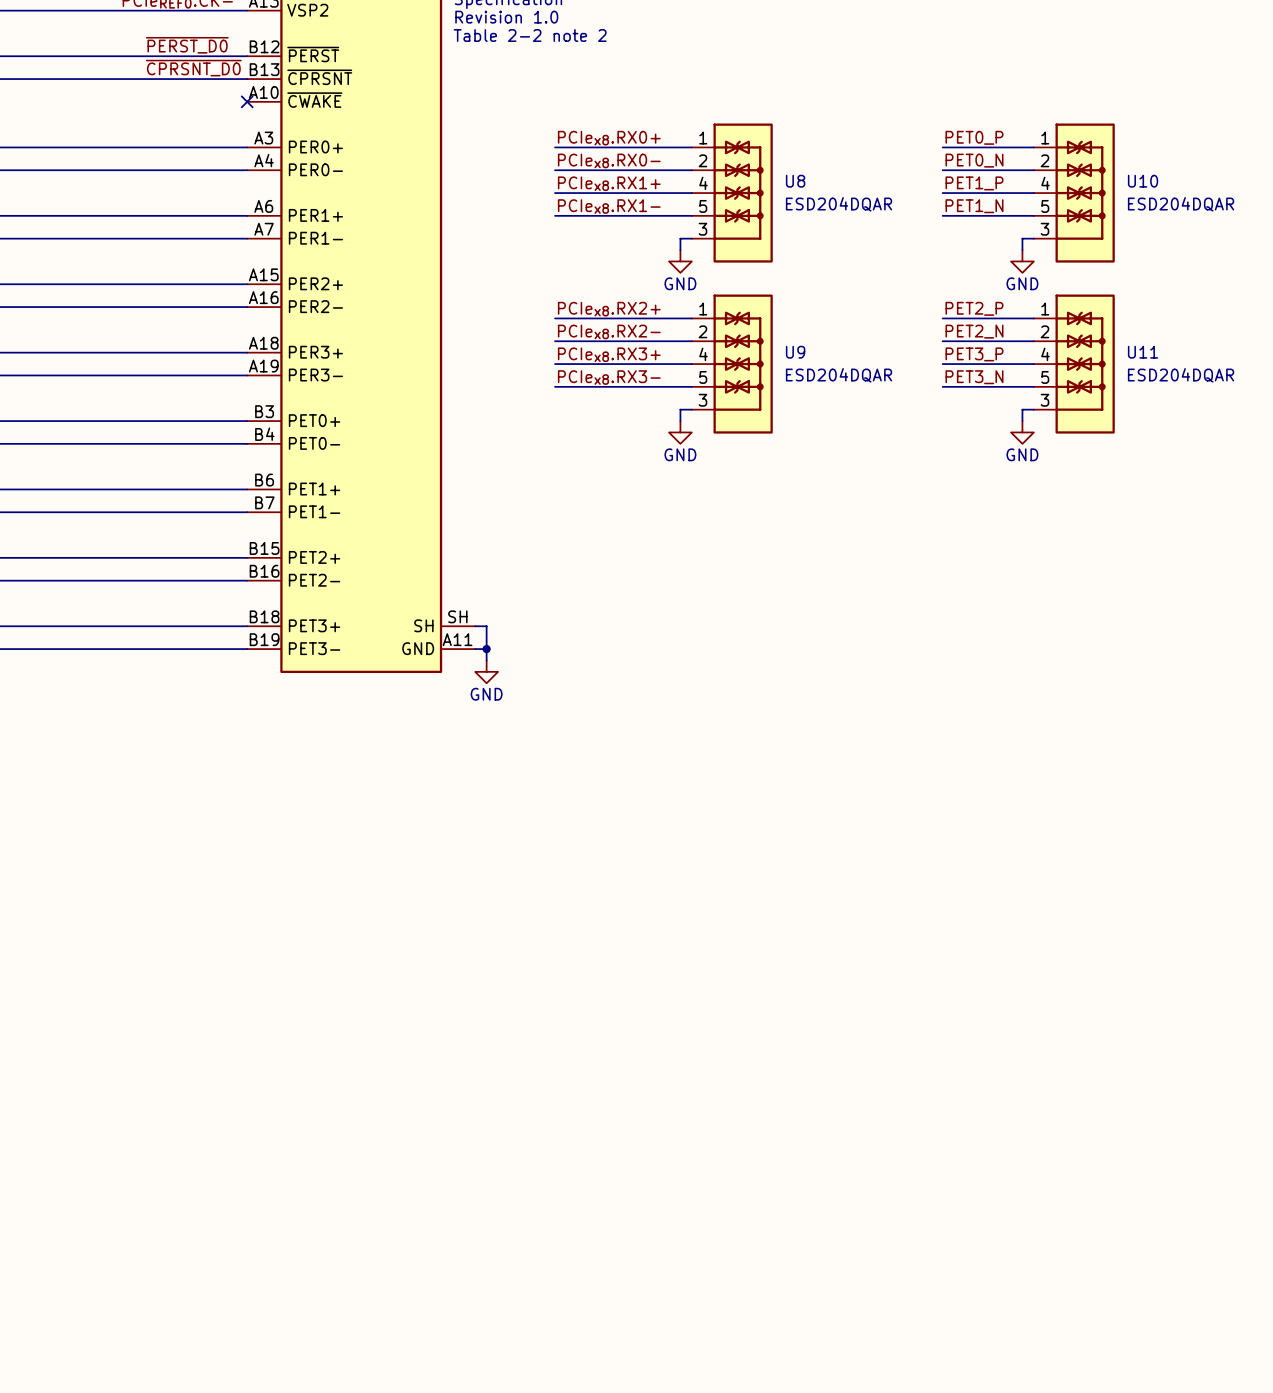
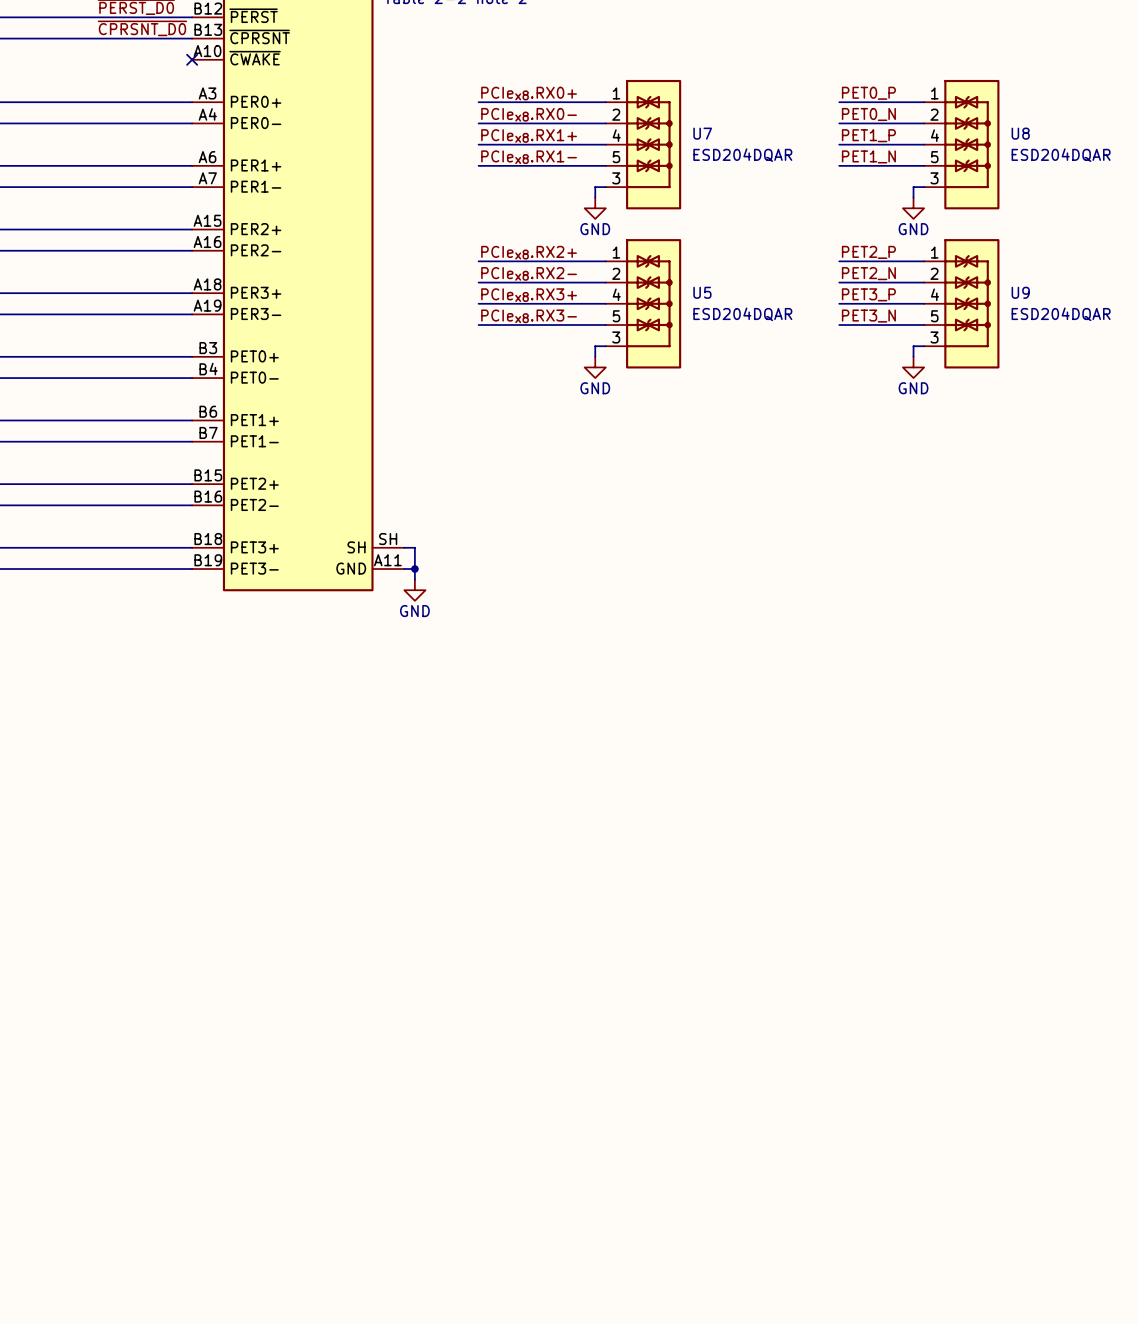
U8 name: U8 (795, 181) -> U7 (702, 133)
U10 name: U10 (1143, 181) -> U8 (1020, 133)
U9 name: U9 (795, 352) -> U5 (702, 292)
U11 name: U11 (1143, 352) -> U9 (1020, 292)

